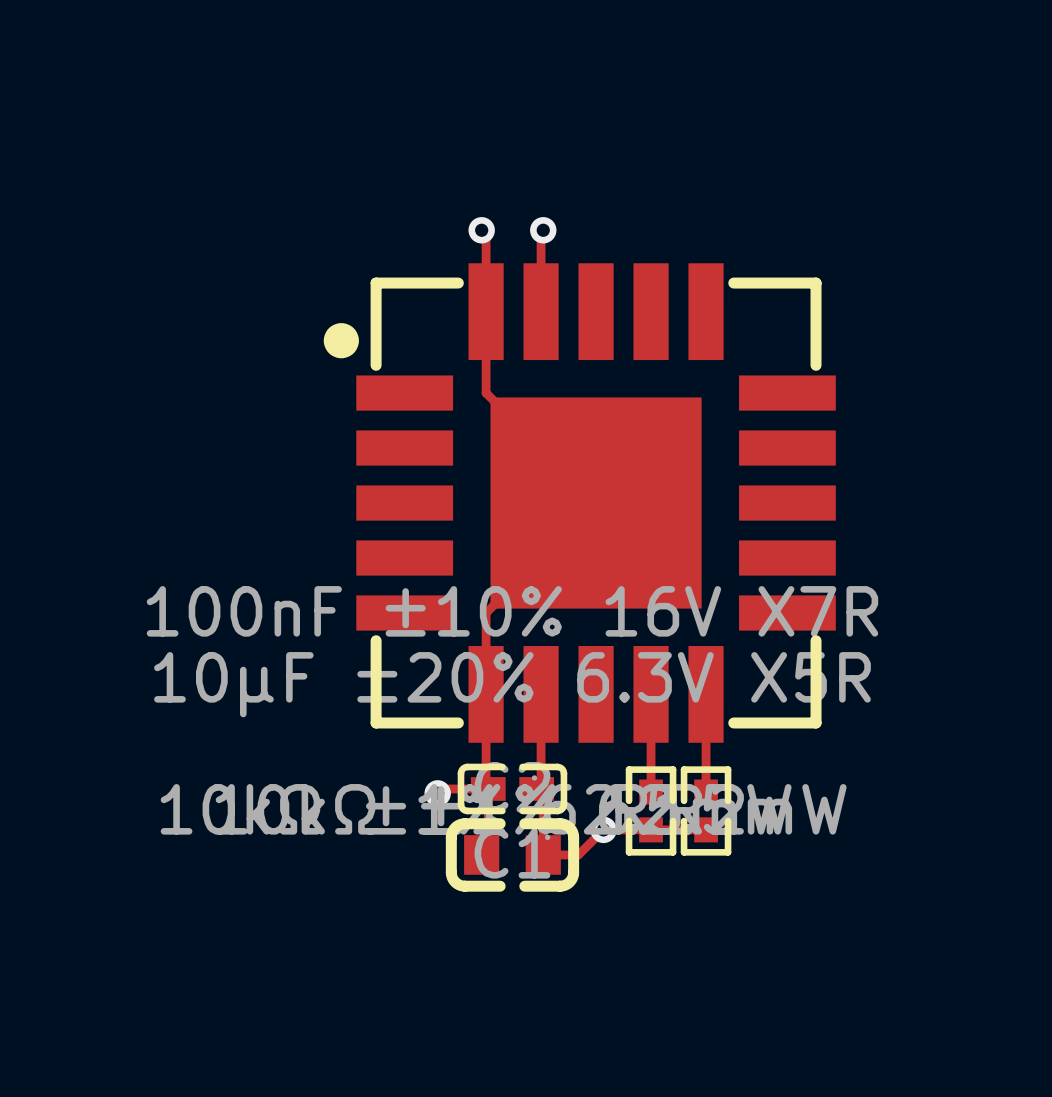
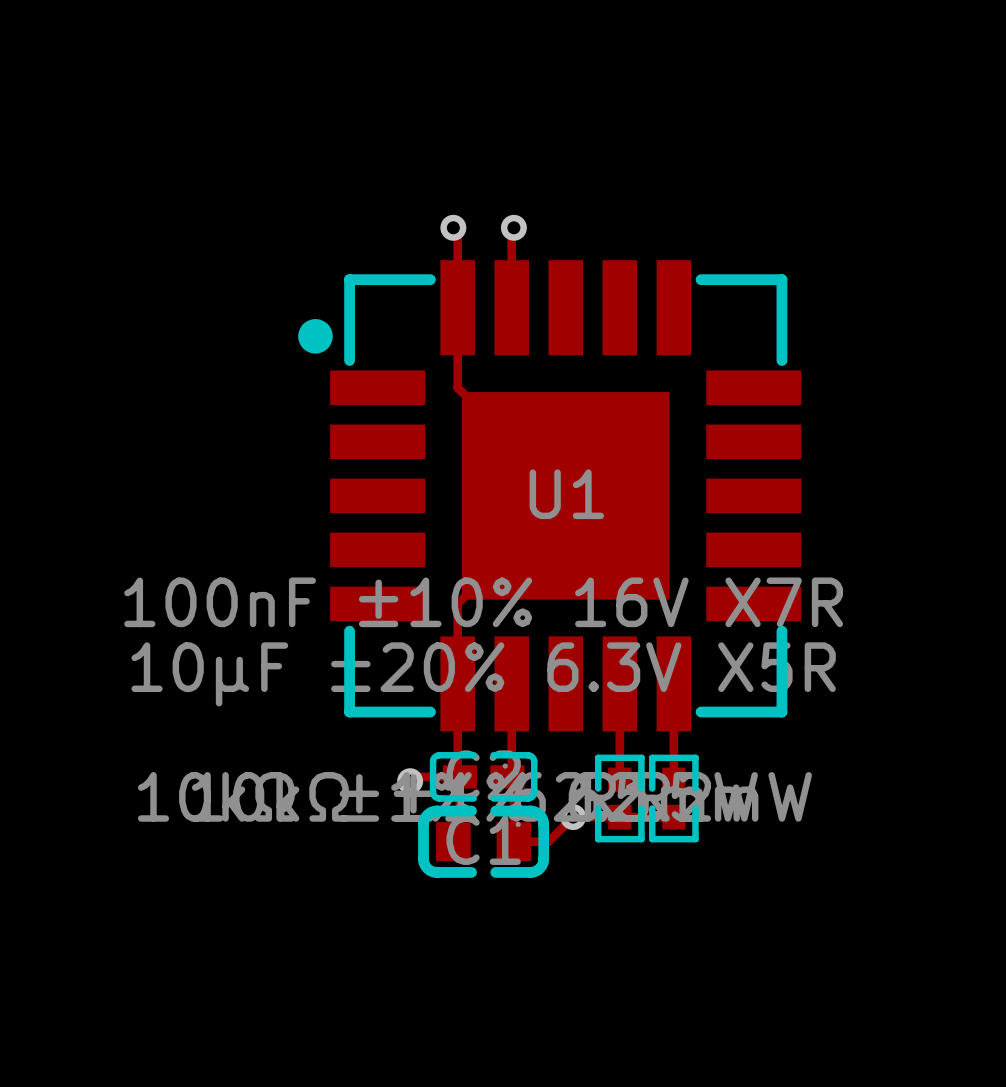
U1 name: none -> U1 (566, 494)

